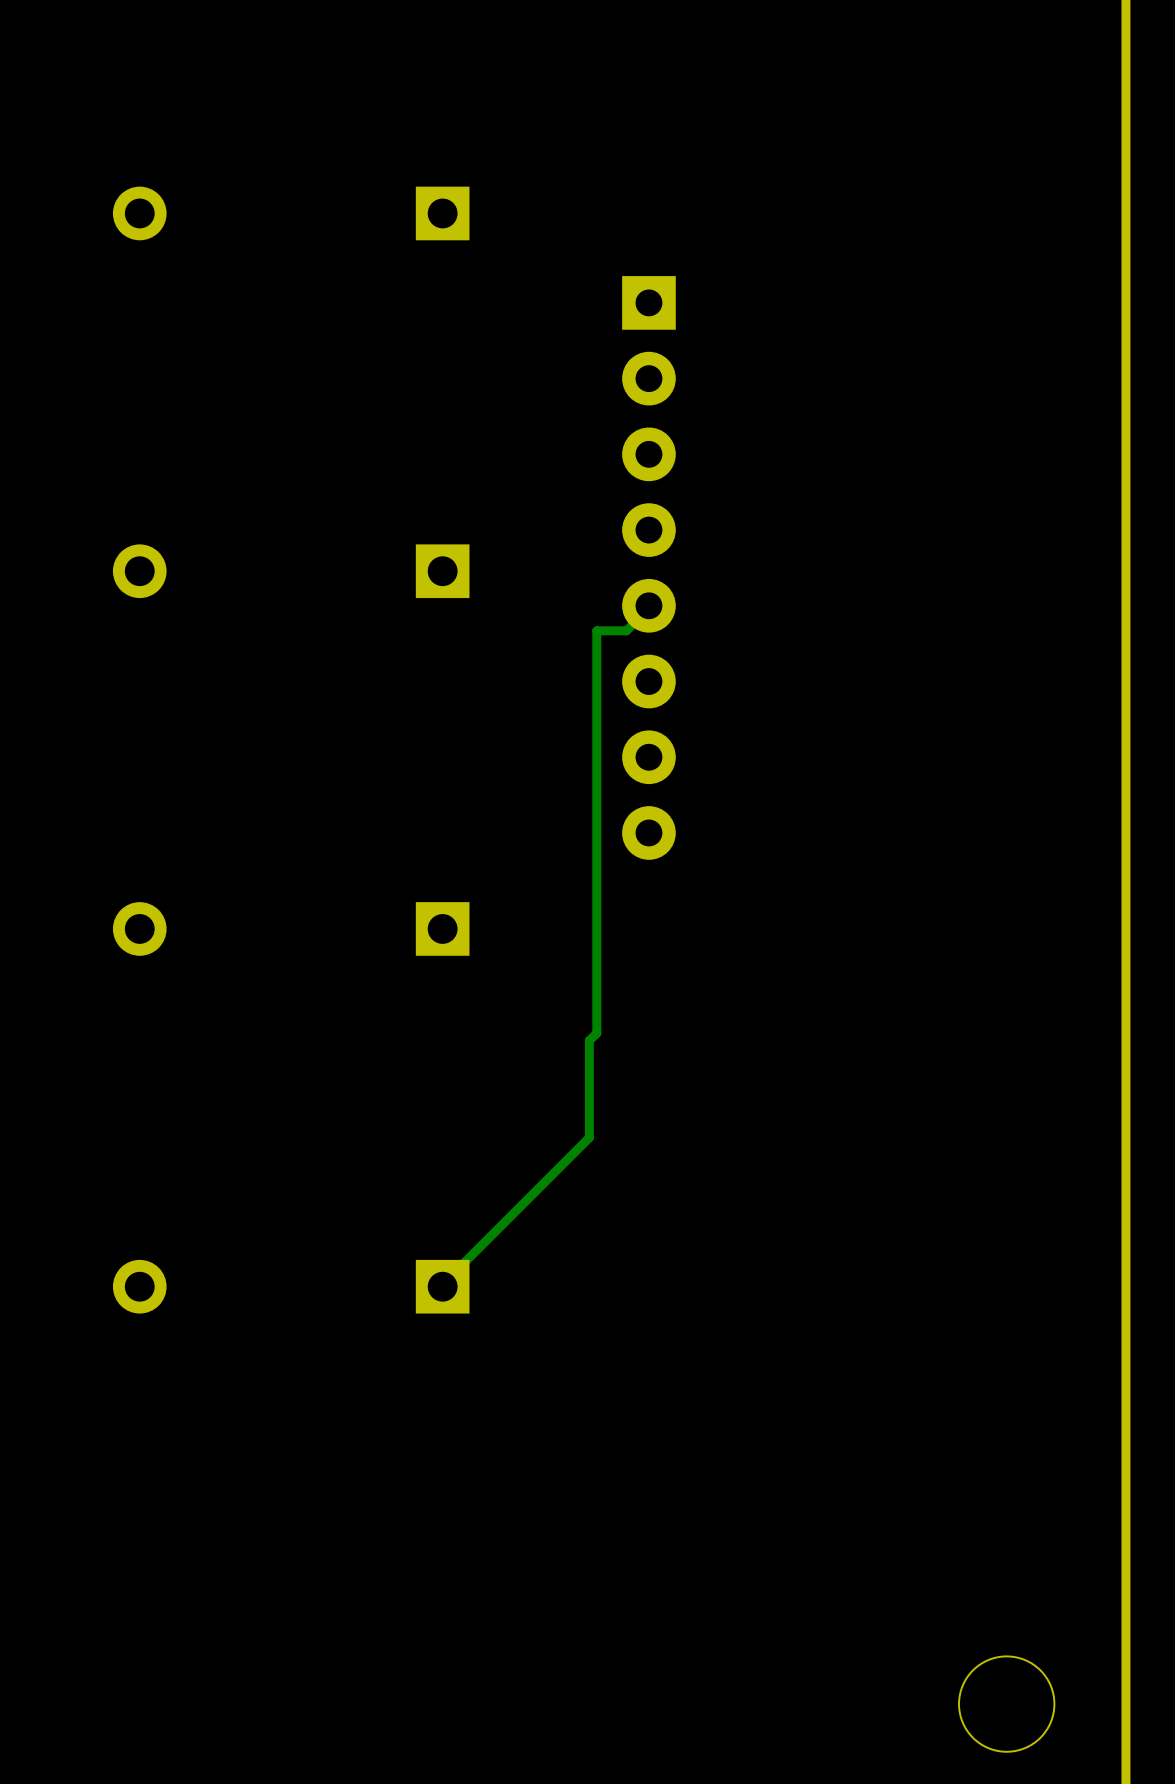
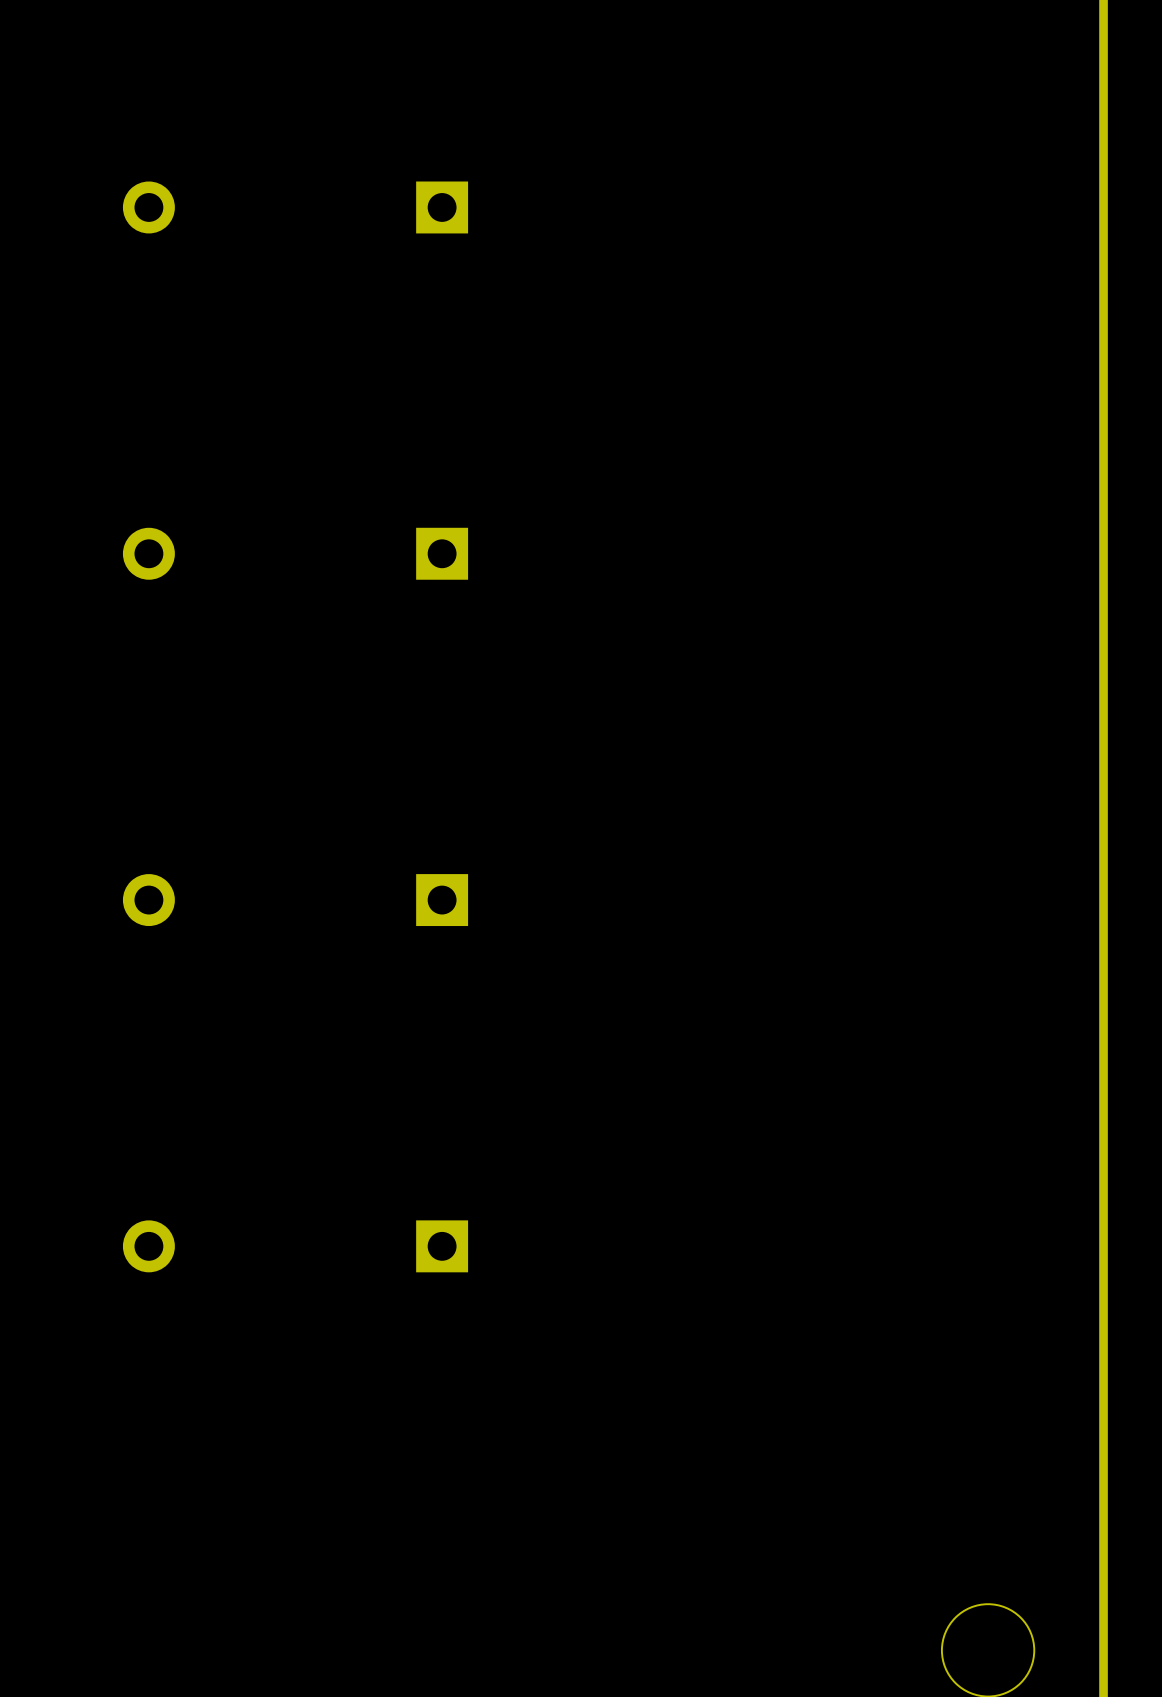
part: (648, 567) -> none
track: (648, 605) (648, 608) (626, 630) (596, 630) (596, 1033) (589, 1040) (589, 1137) (440, 1286) (442, 1286) -> none

